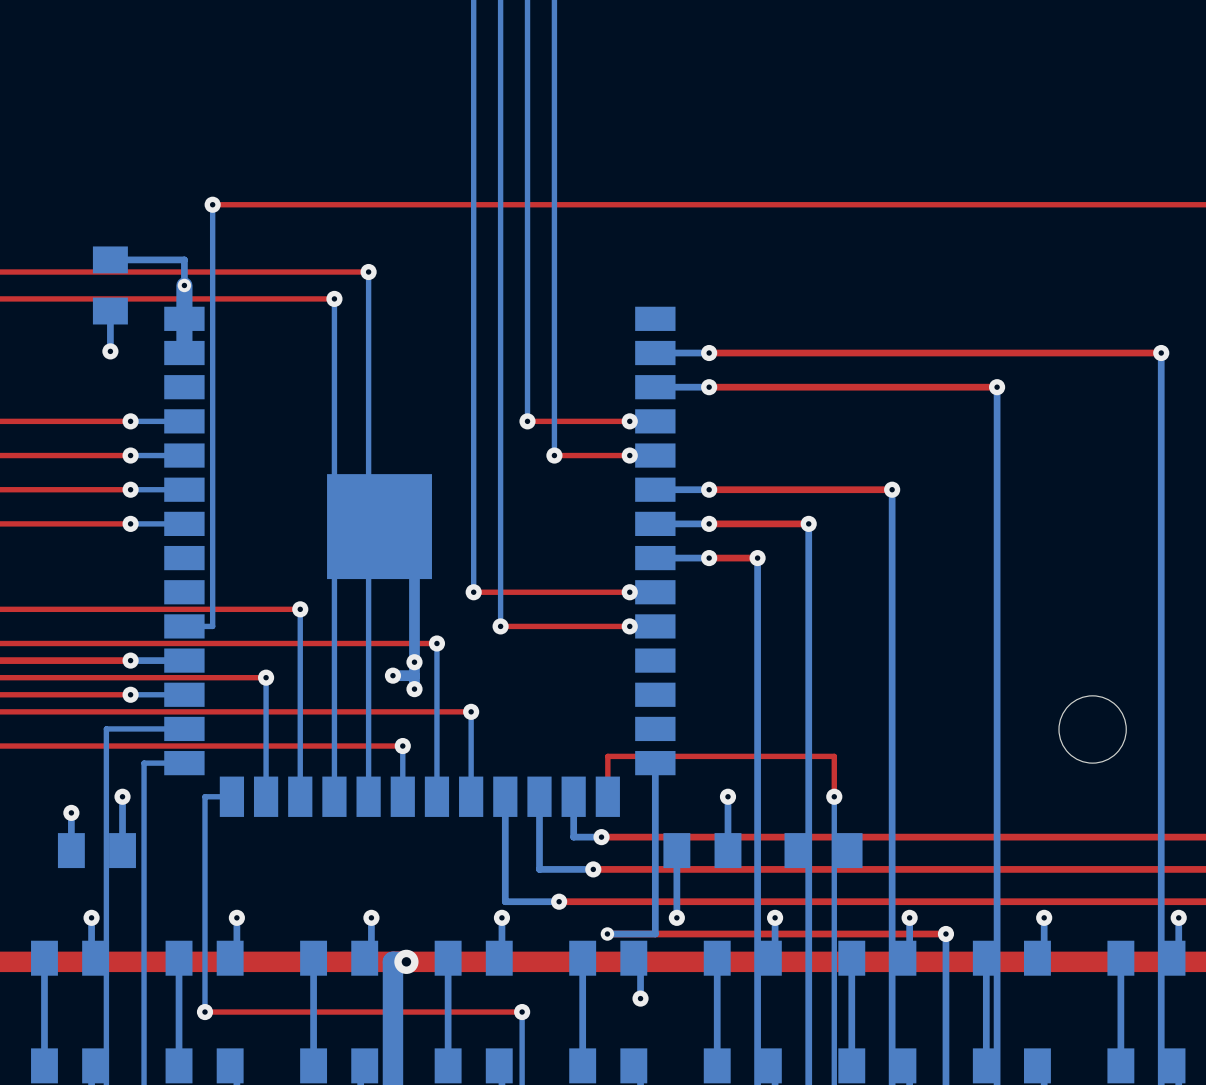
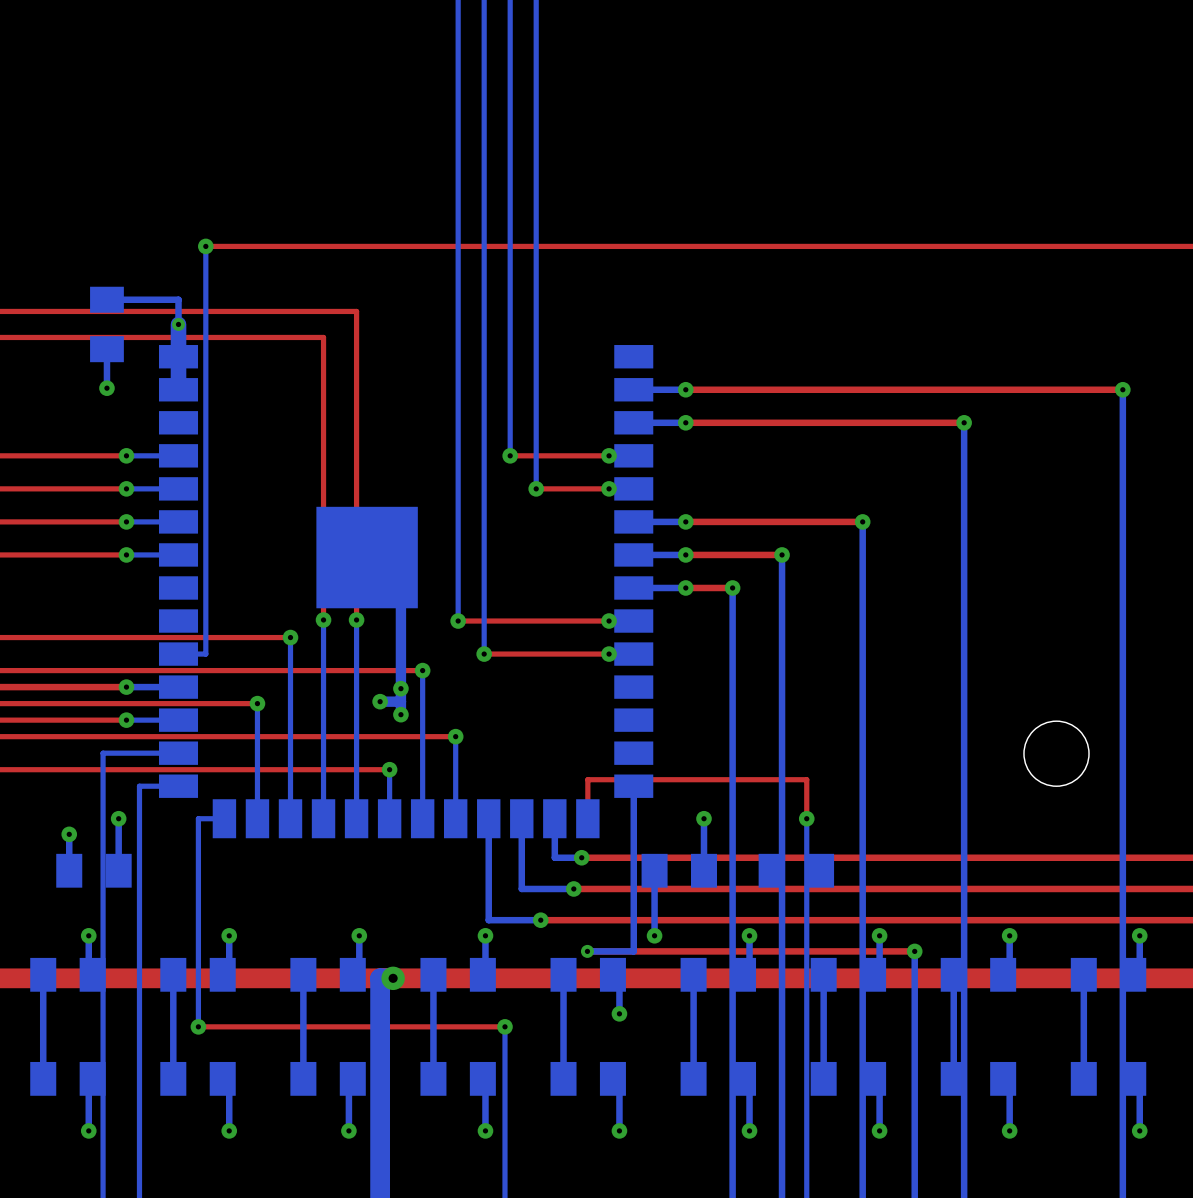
bottom track: (368, 272) (368, 591) -> none
top track: none -> (356, 311) (356, 619)
via: (368, 272) -> none
bottom track: (334, 298) (334, 591) -> none
top track: none -> (323, 337) (323, 619)
via: (334, 298) -> none
via: none -> (323, 619)
via: none -> (356, 619)

